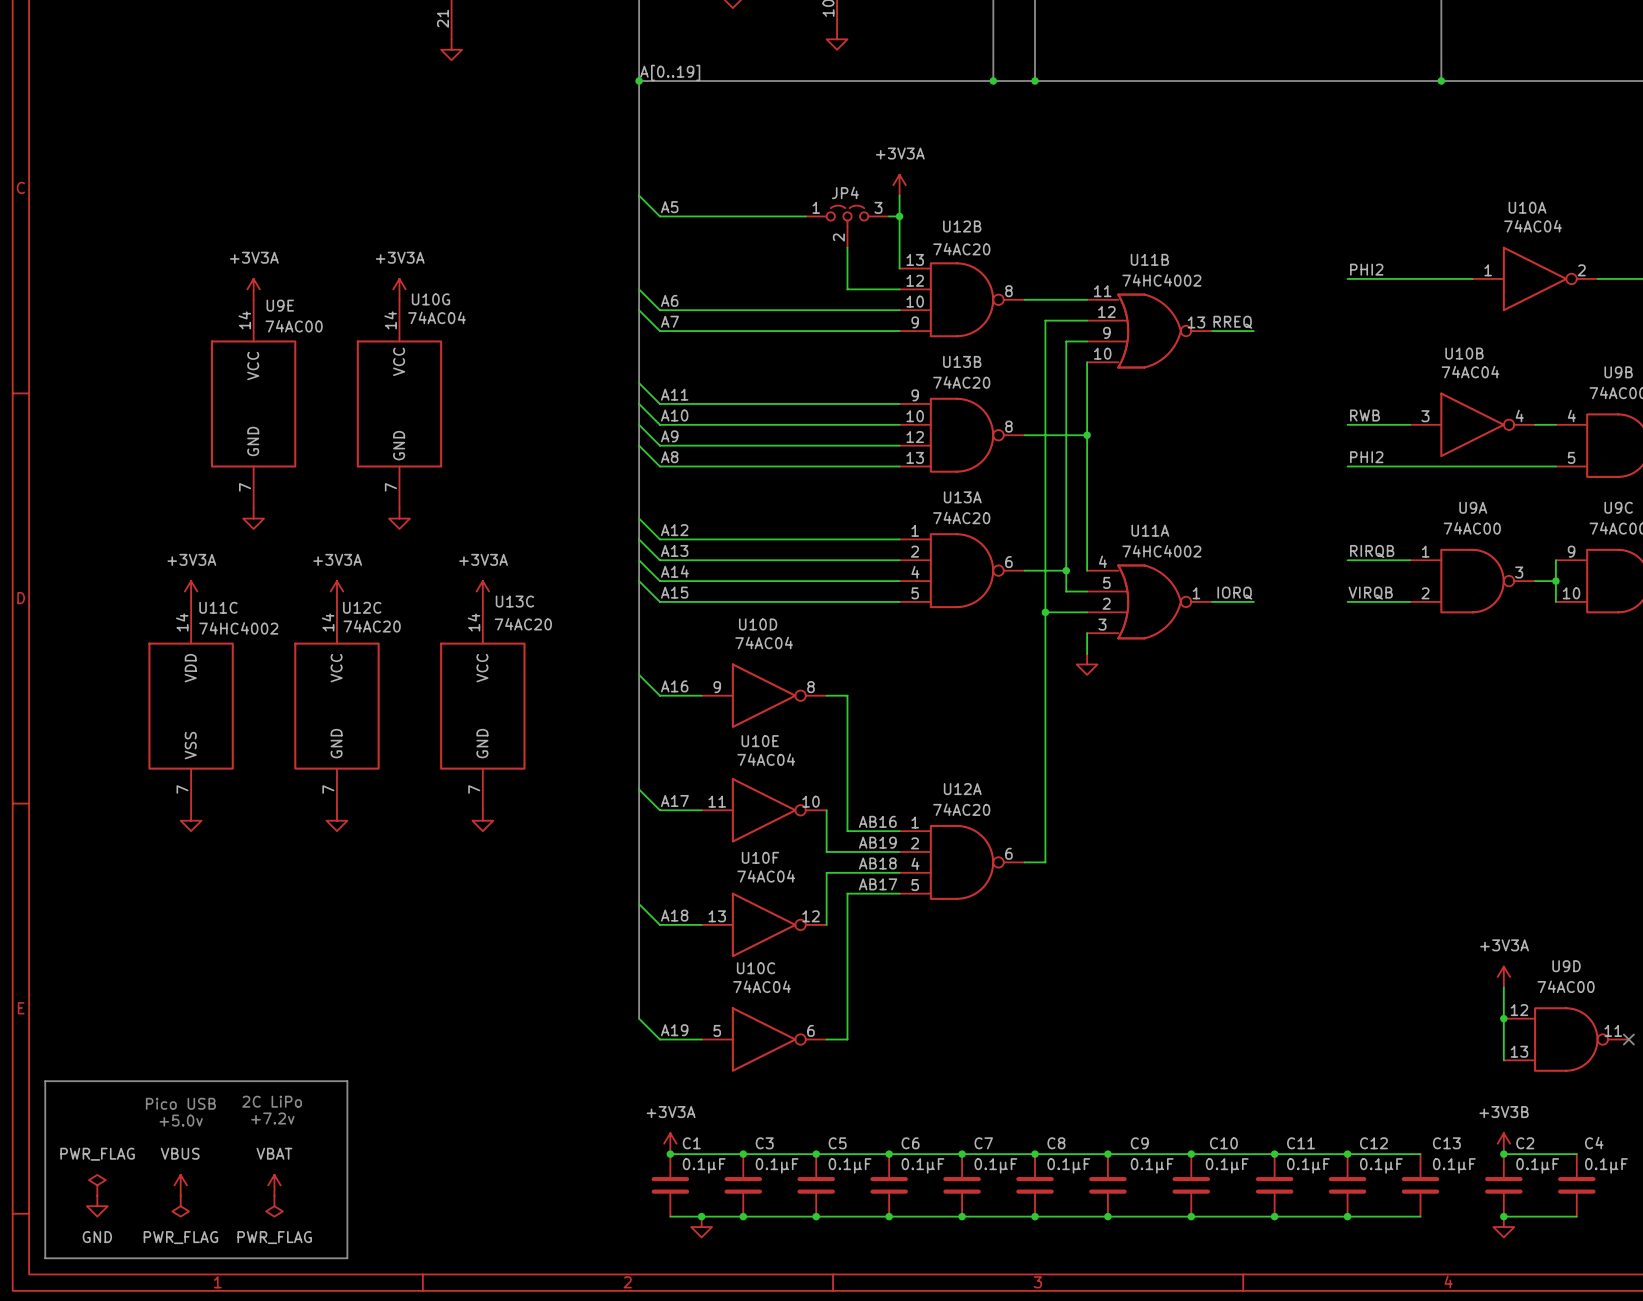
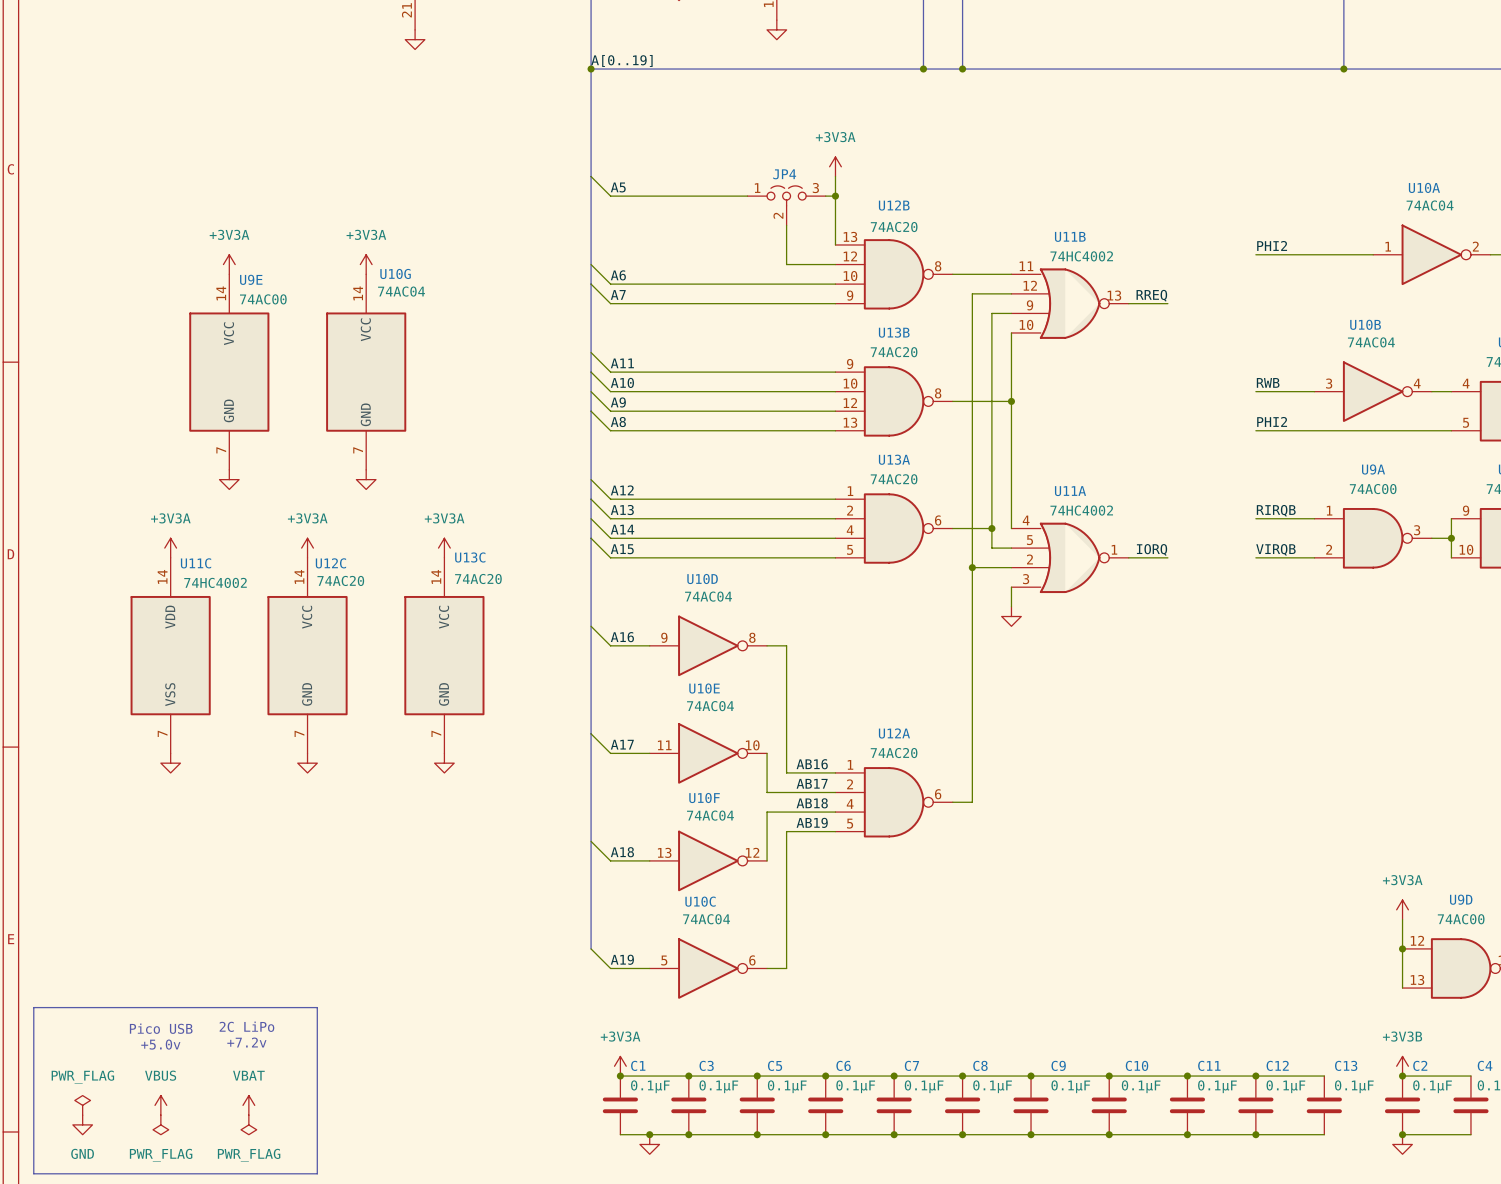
label: AB19 (877, 842) -> AB17 (812, 783)
label: AB17 (878, 884) -> AB19 (812, 822)

